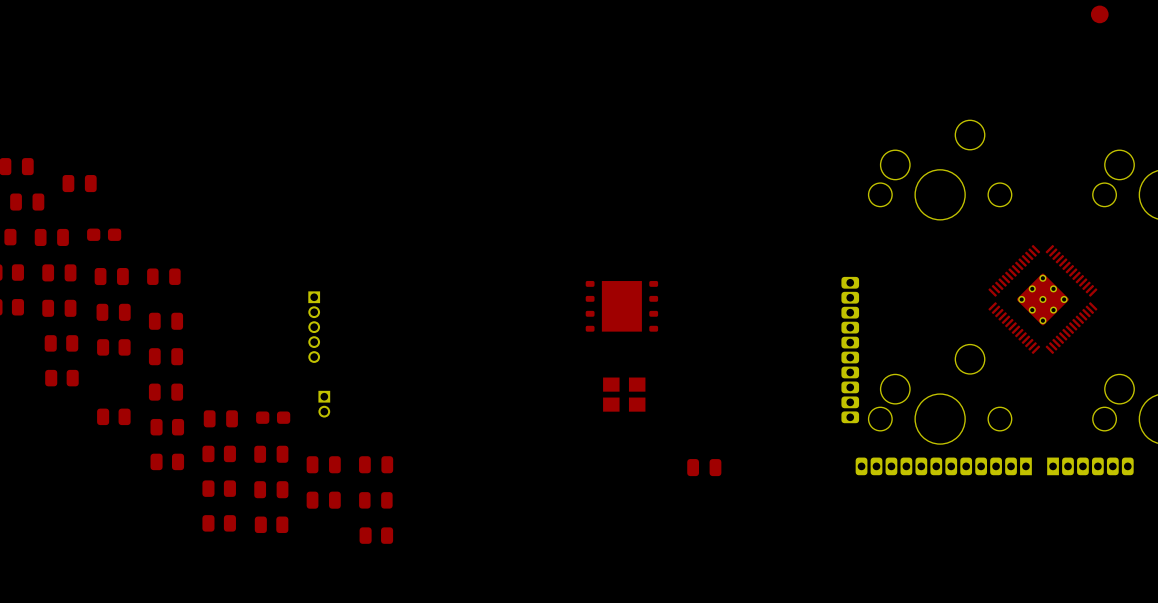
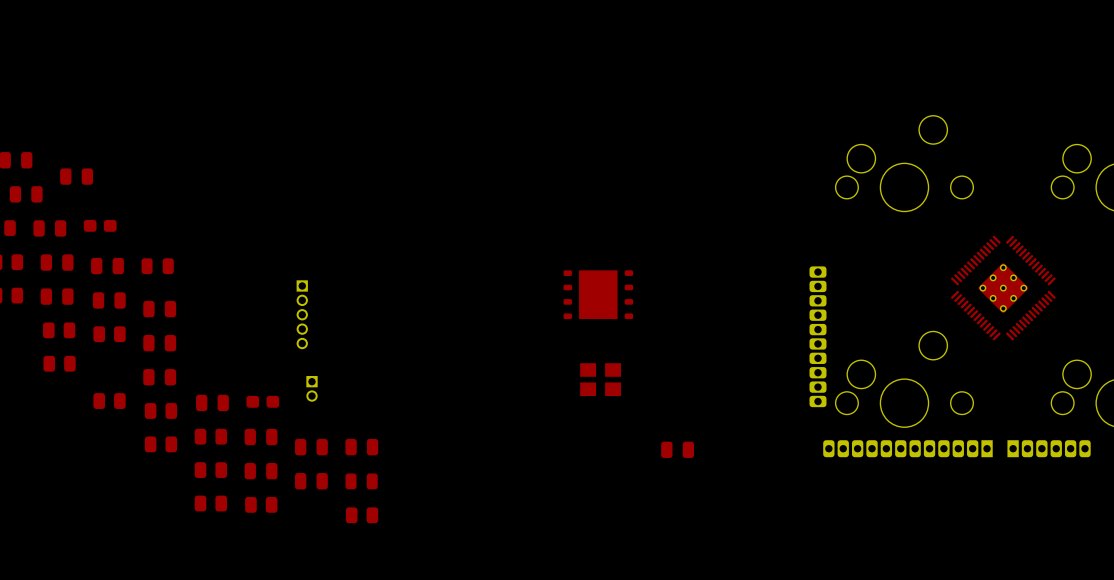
part: (1099, 14) -> none

